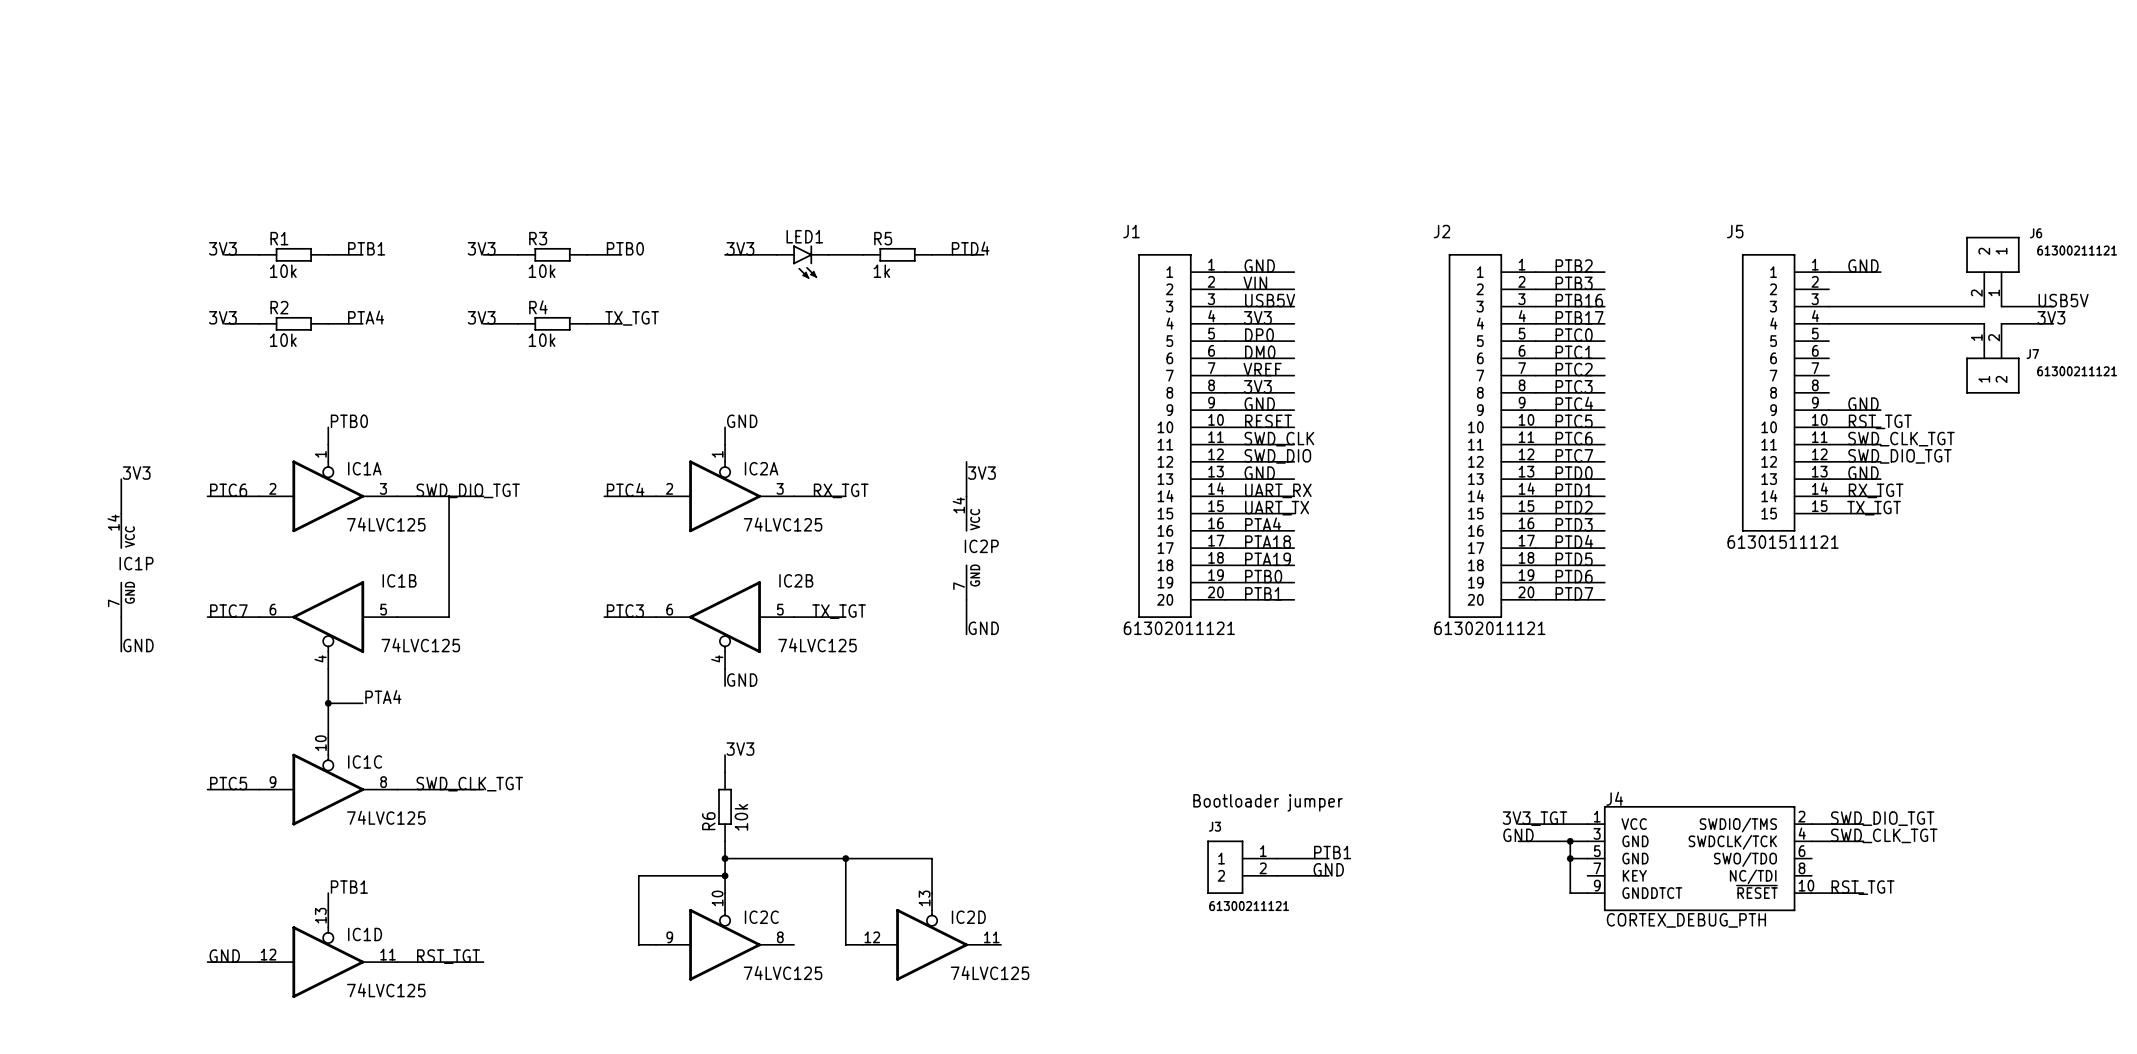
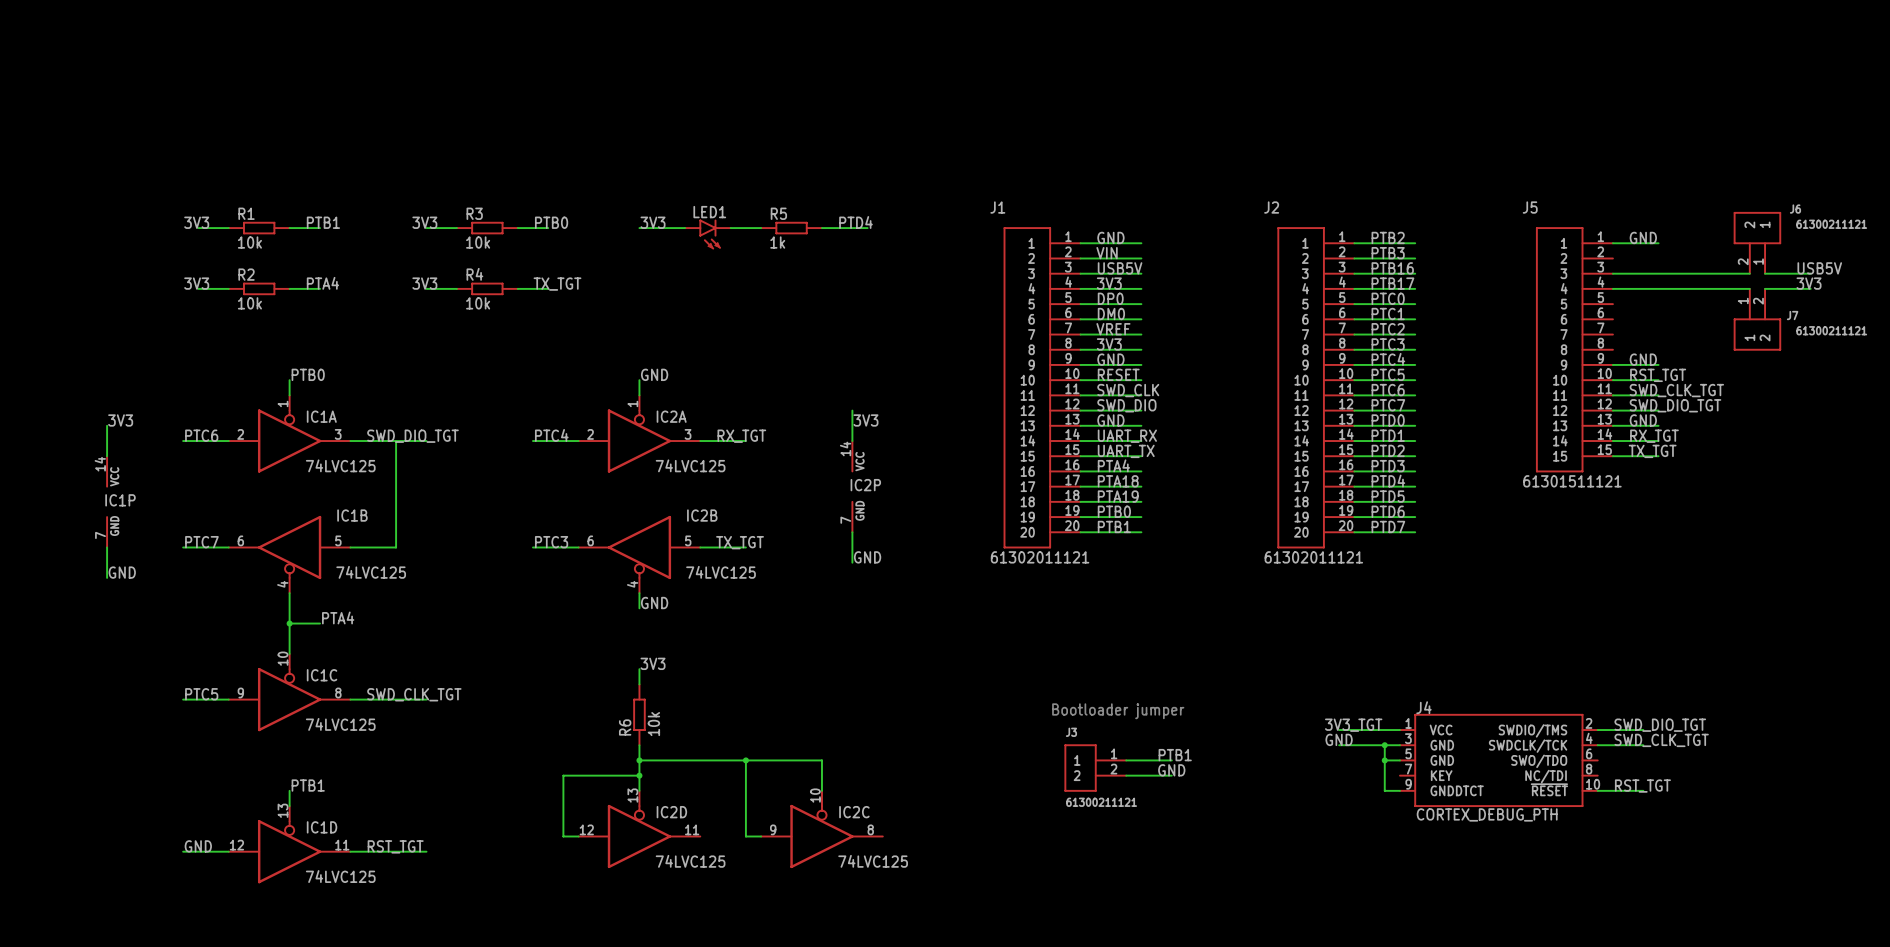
IC2C position: (725, 936) -> (821, 829)
IC2D position: (932, 936) -> (639, 829)

